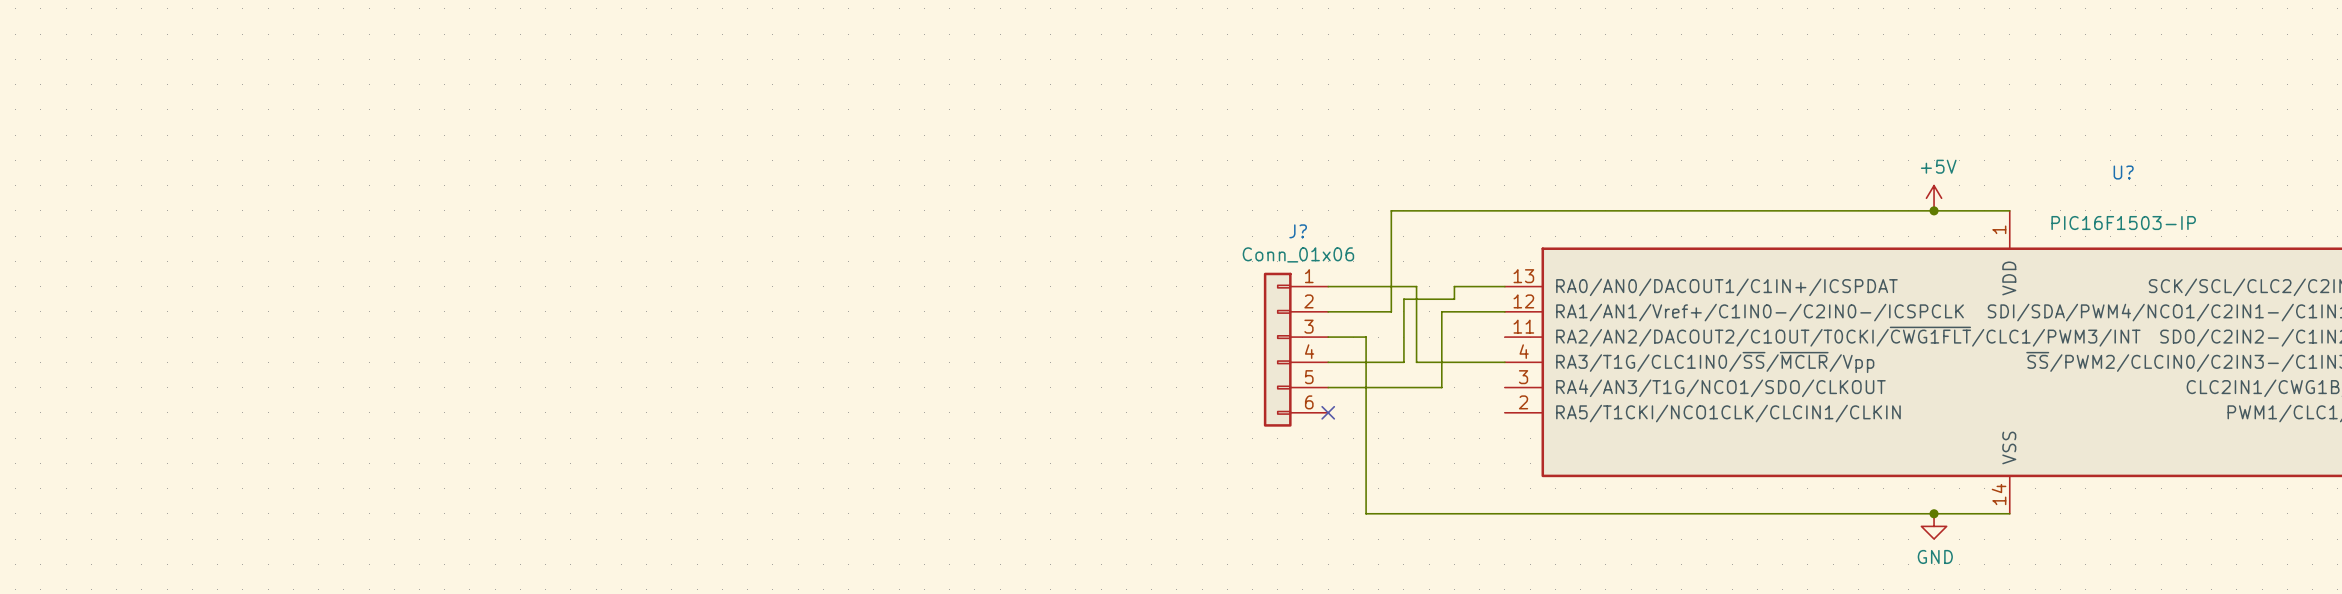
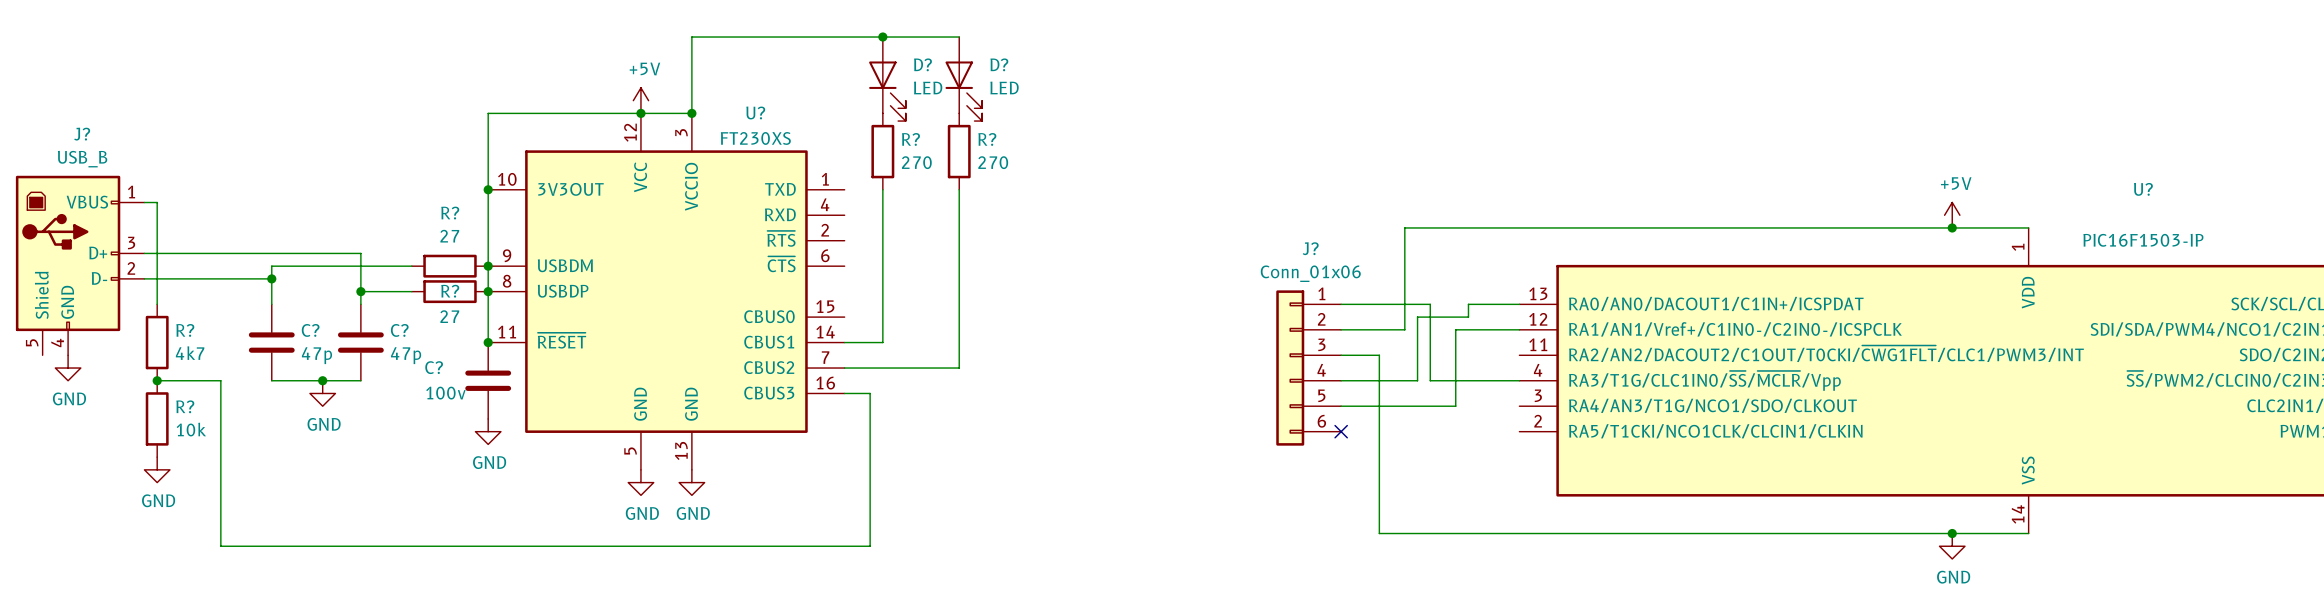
junction: none -> (882, 37)
wire: none -> (959, 37) (691, 37) (691, 113) (488, 113) (488, 342)
D?: none -> LED (887, 79)
D?: none -> LED (963, 79)
power symbol: none -> +5V (640, 100)
junction: none -> (640, 113)
junction: none -> (691, 113)
R?: none -> 270 (882, 151)
R?: none -> 270 (959, 151)
junction: none -> (488, 189)
wire: none -> (882, 189) (882, 342) (844, 342)
wire: none -> (959, 189) (959, 368) (844, 368)
wire: none -> (144, 202) (157, 202) (157, 304)
wire: none -> (144, 253) (360, 253) (360, 304)
J?: none -> USB_B (80, 265)
wire: none -> (411, 266) (271, 266) (271, 304)
R?: none -> 27 (450, 266)
junction: none -> (488, 266)
wire: none -> (144, 278) (271, 278)
junction: none -> (271, 278)
wire: none -> (360, 291) (411, 291)
junction: none -> (360, 291)
R?: none -> 27 (450, 291)
junction: none -> (488, 291)
U?: none -> FT230XS (666, 291)
R?: none -> 4k7 (157, 342)
C?: none -> 47p (271, 342)
C?: none -> 47p (360, 342)
junction: none -> (488, 342)
power symbol: none -> GND (68, 368)
wire: none -> (157, 380) (220, 380) (220, 546) (870, 546) (870, 393) (844, 393)
junction: none -> (157, 380)
wire: none -> (271, 380) (360, 380)
junction: none -> (322, 380)
C?: none -> 100v (488, 380)
power symbol: none -> GND (322, 393)
R?: none -> 10k (157, 418)
power symbol: none -> GND (488, 431)
power symbol: none -> GND (157, 469)
power symbol: none -> GND (640, 482)
power symbol: none -> GND (691, 482)

